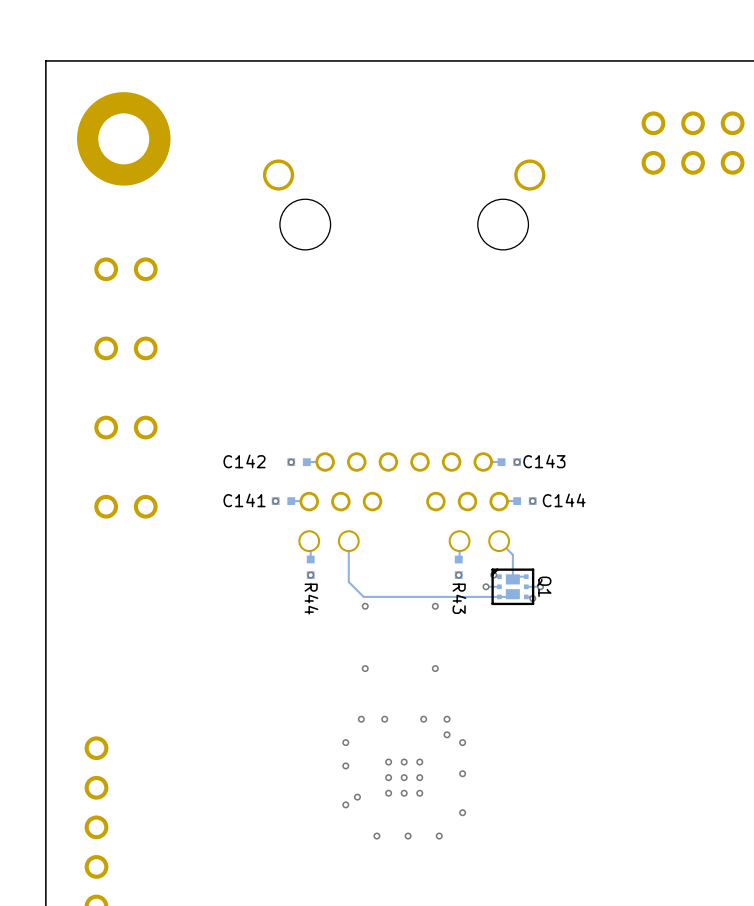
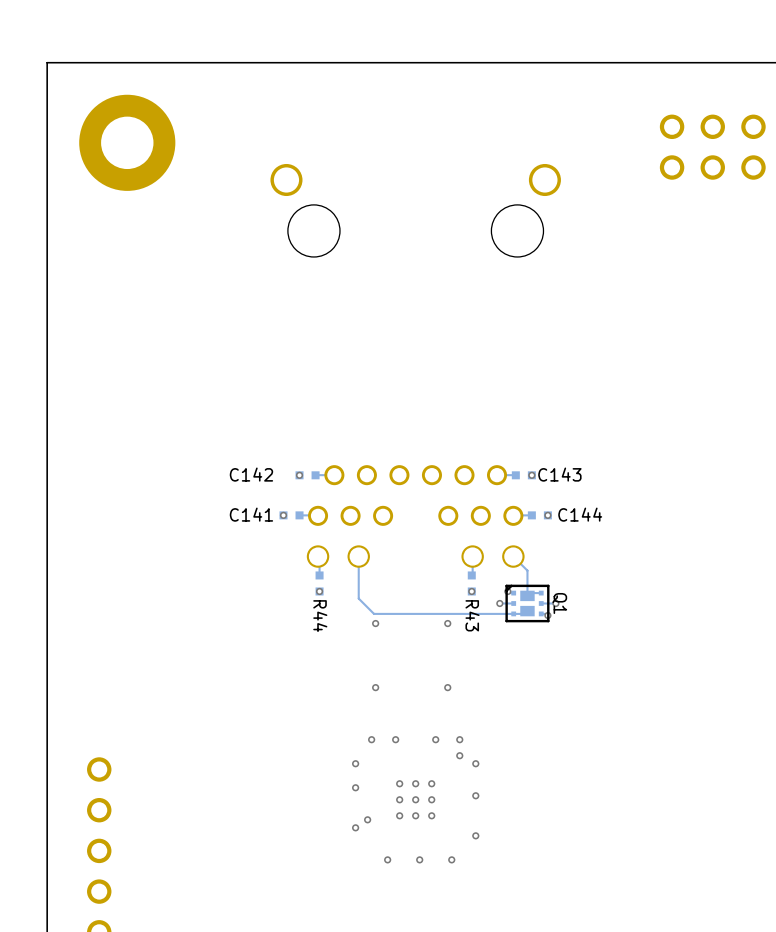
part: (125, 269) -> none
part: (125, 348) -> none
part: (125, 427) -> none
part: (125, 506) -> none

